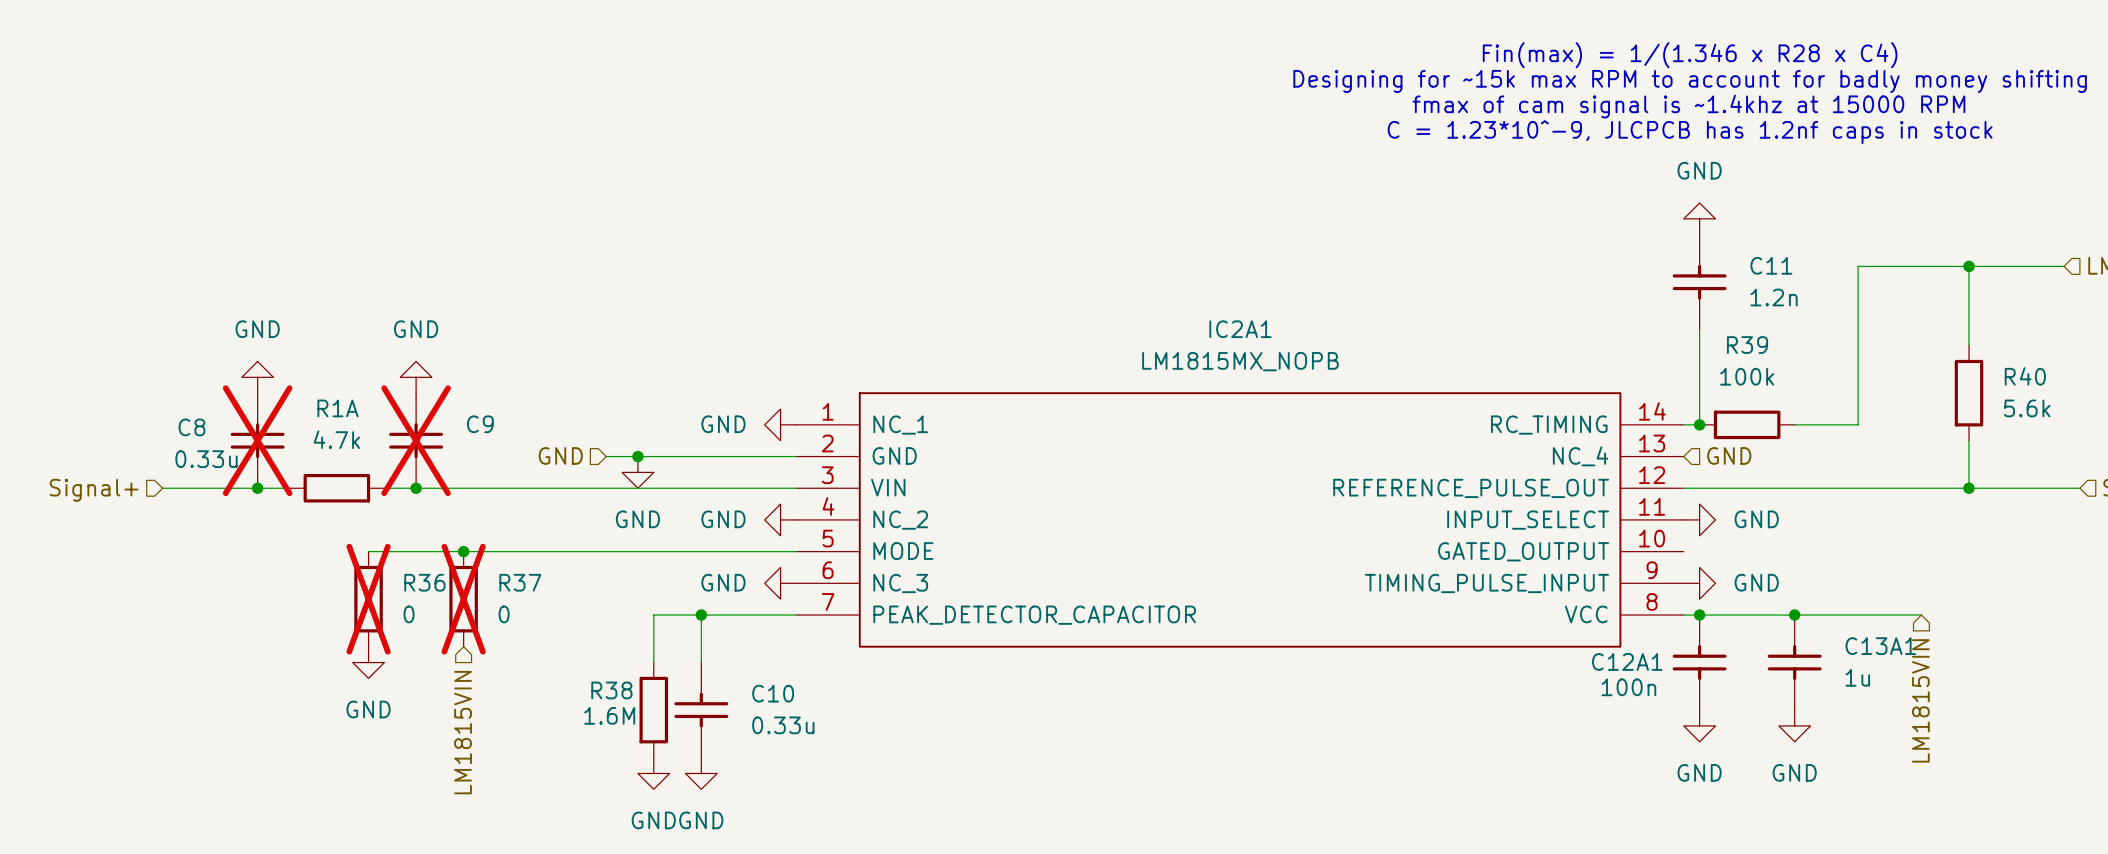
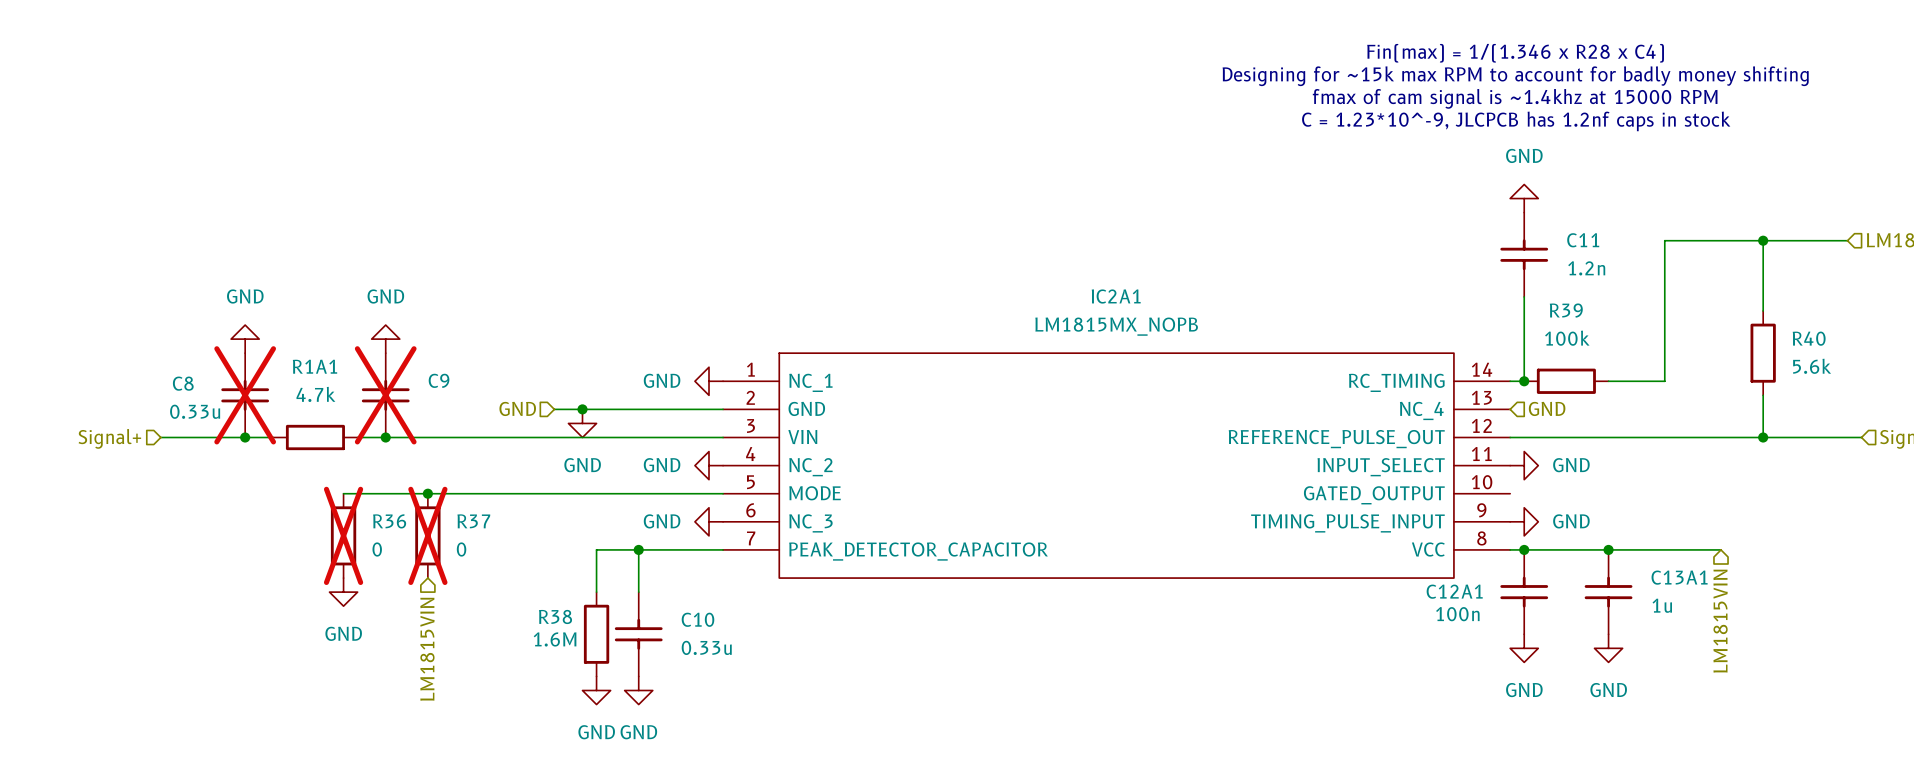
R1A name: R1A (338, 408) -> R1A1 (315, 366)

